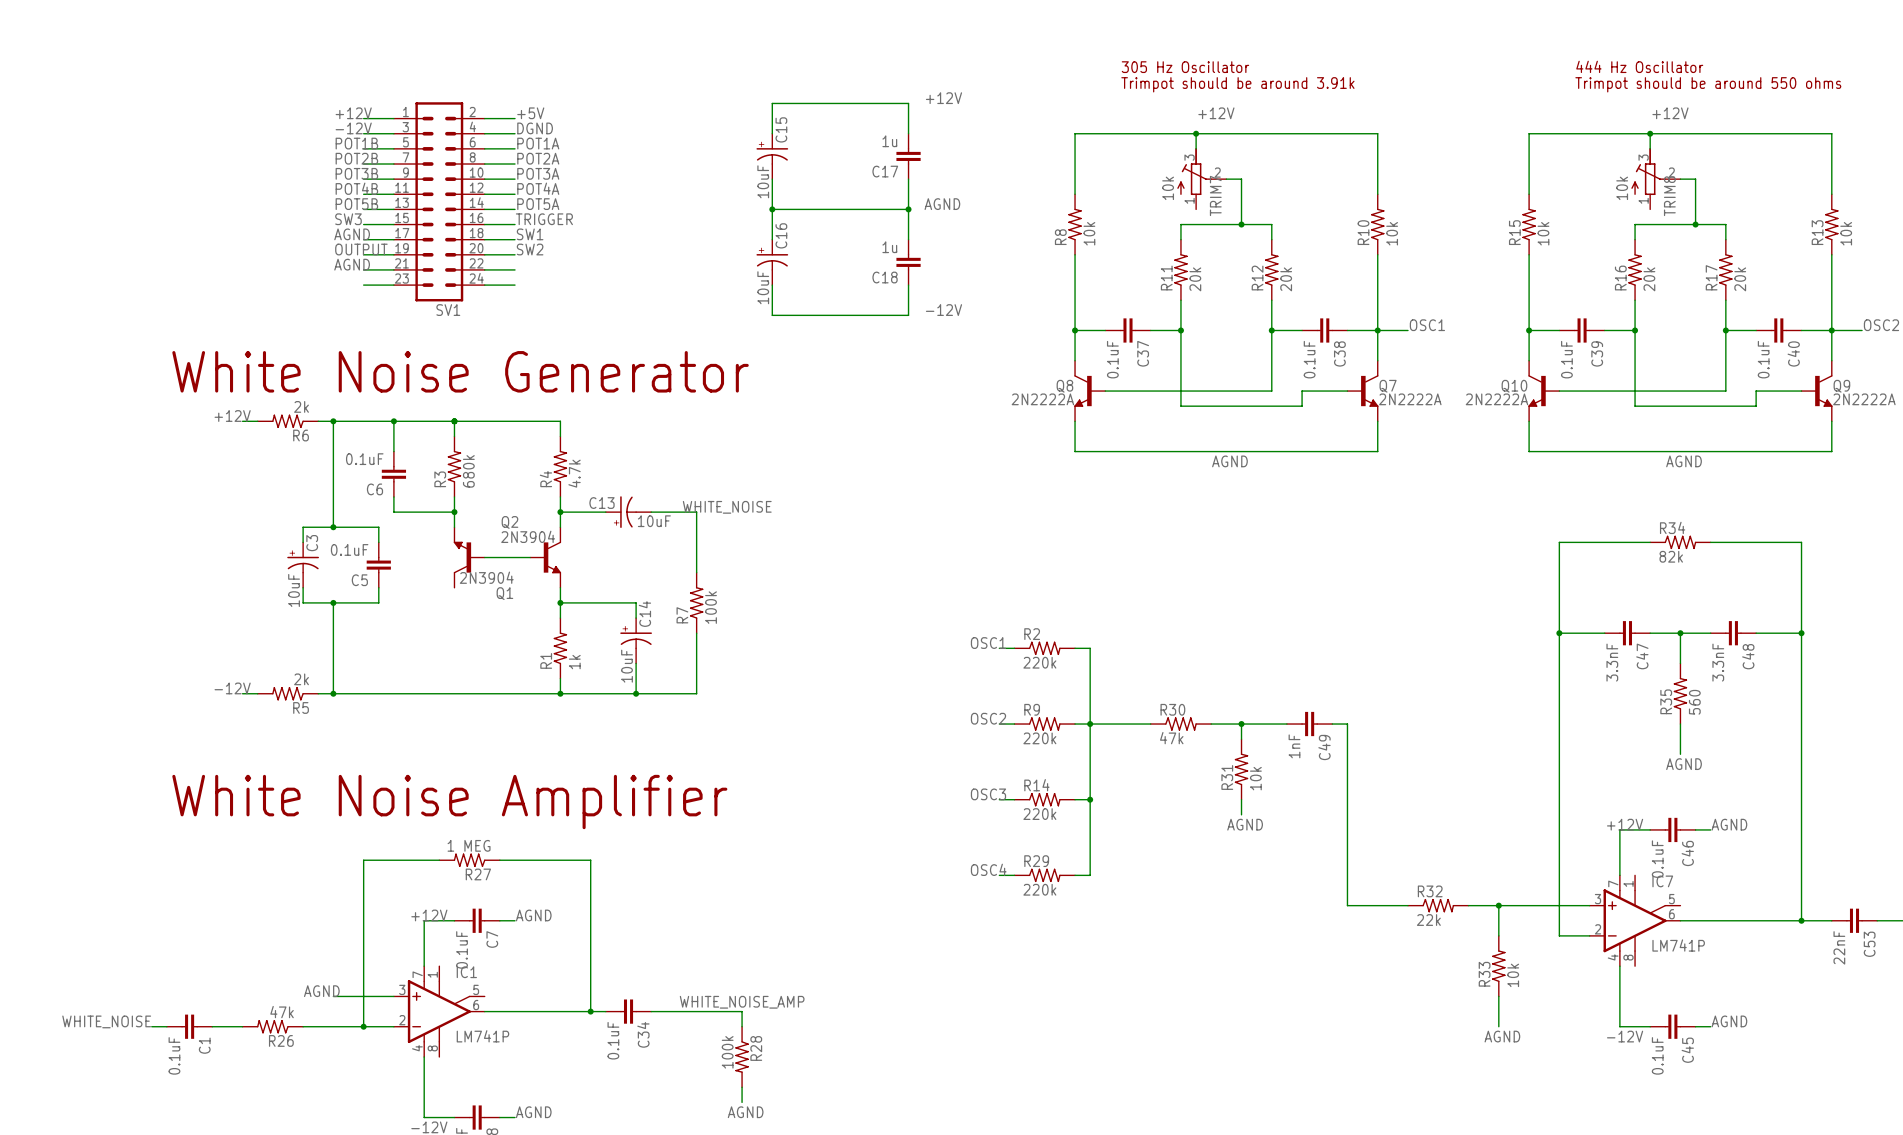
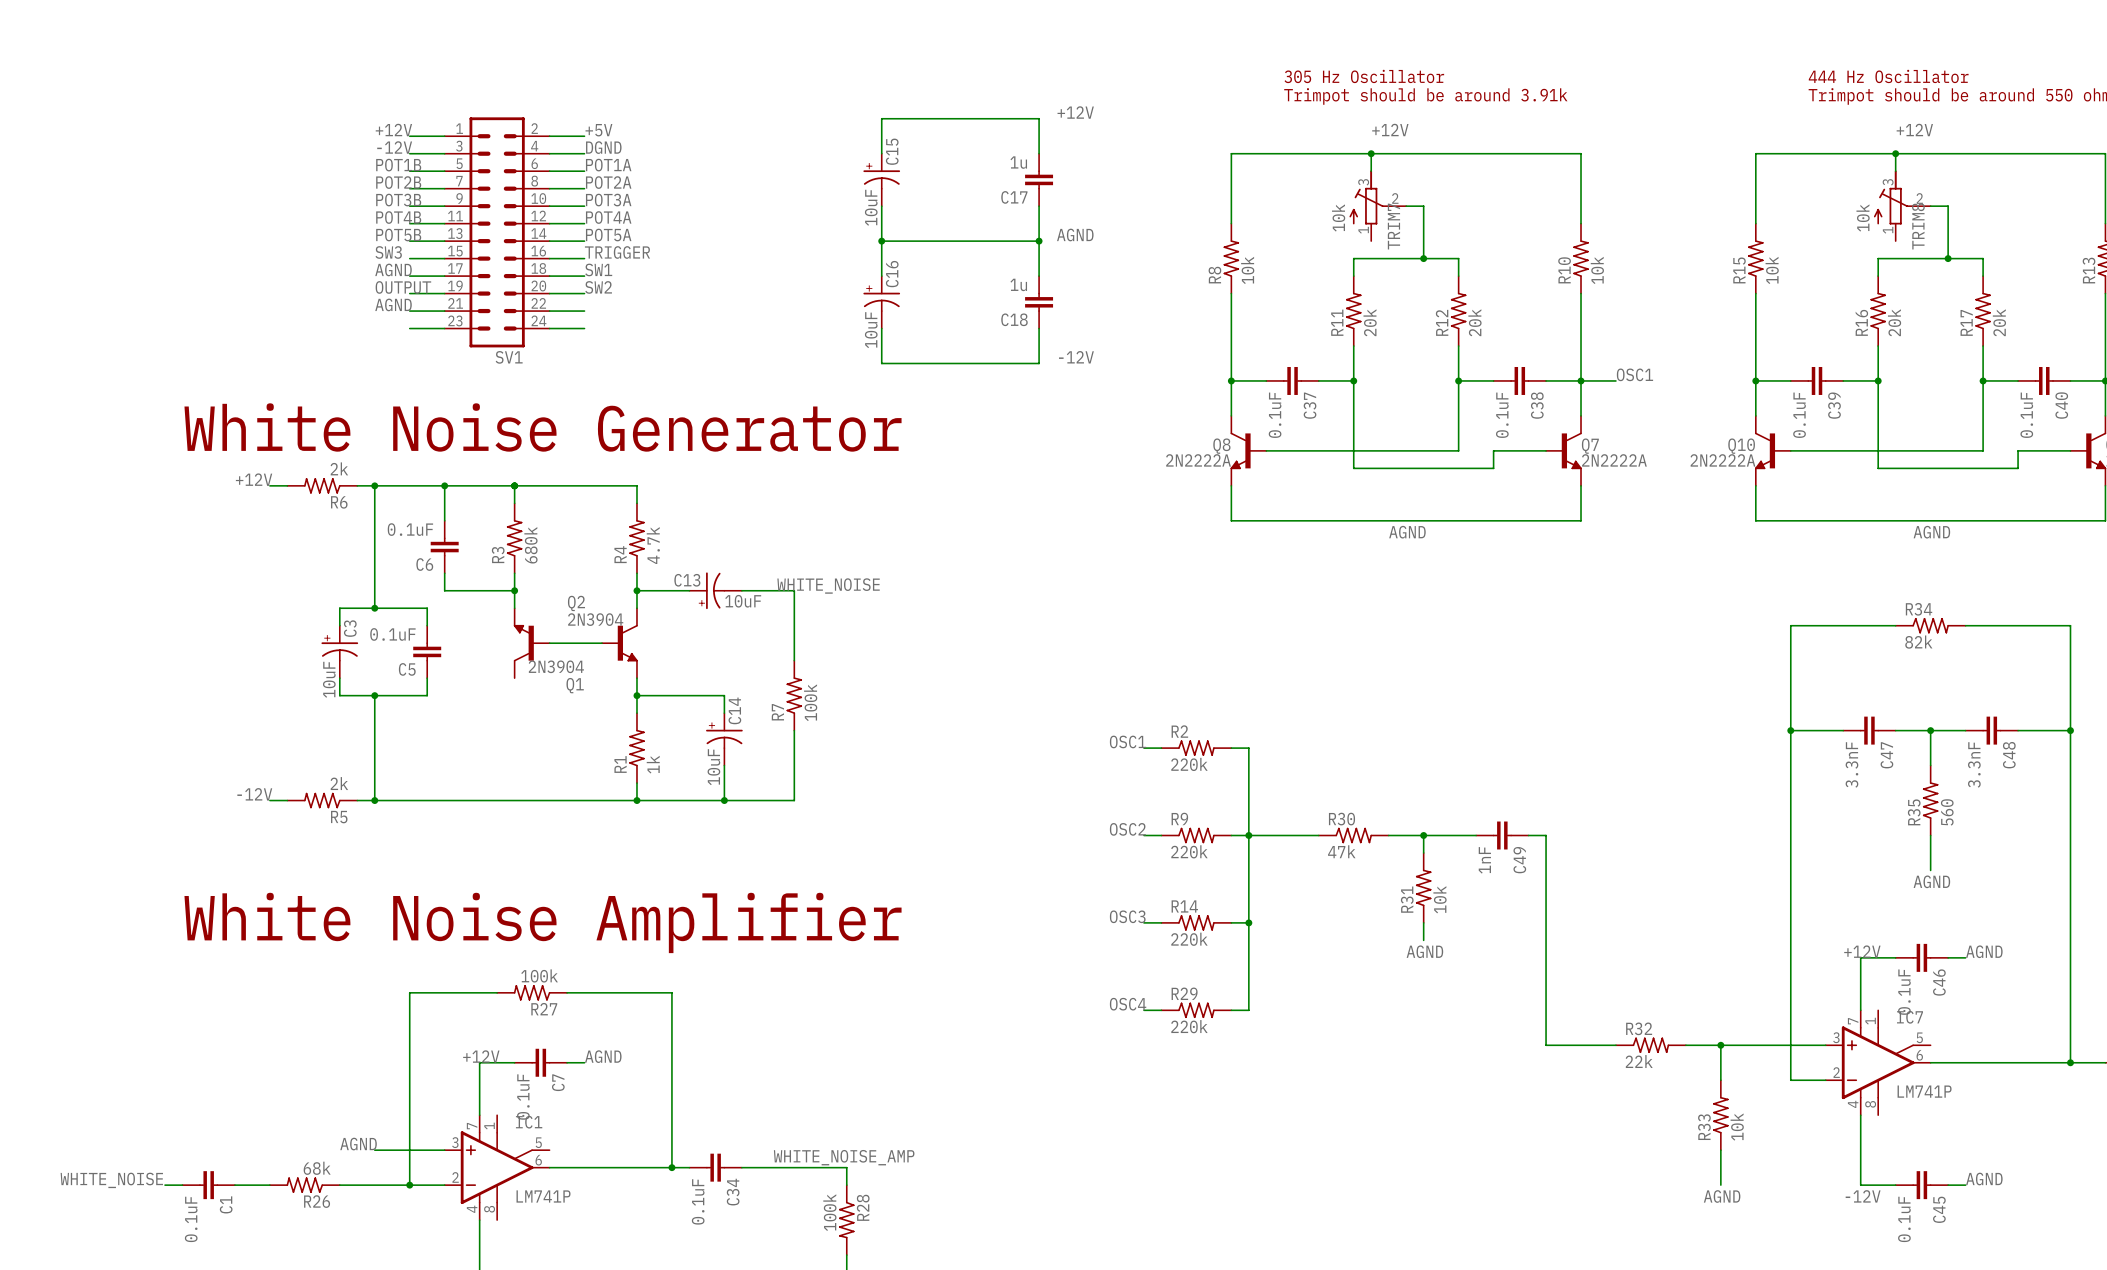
R27 value: 1 MEG (469, 845) -> 100k (539, 975)
R26 value: 47k (282, 1012) -> 68k (317, 1168)

